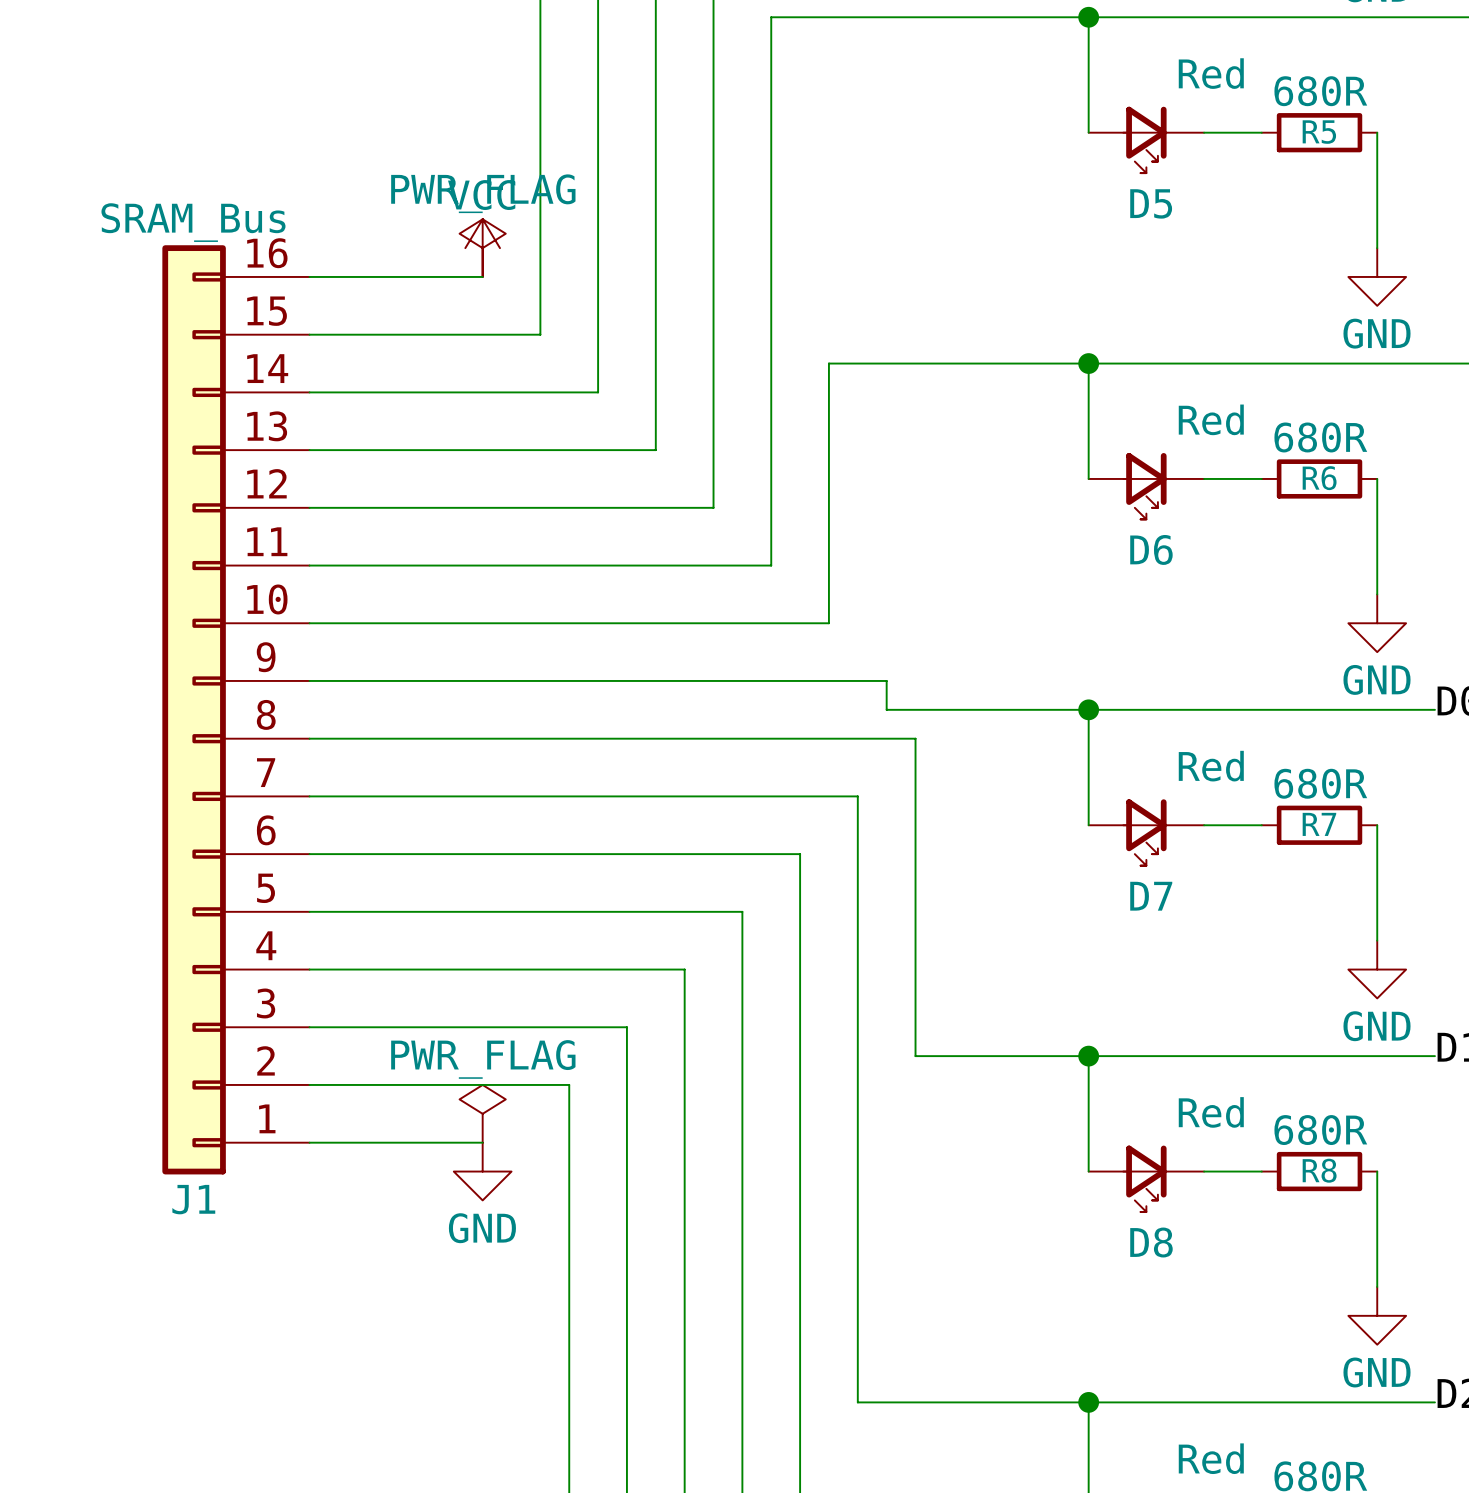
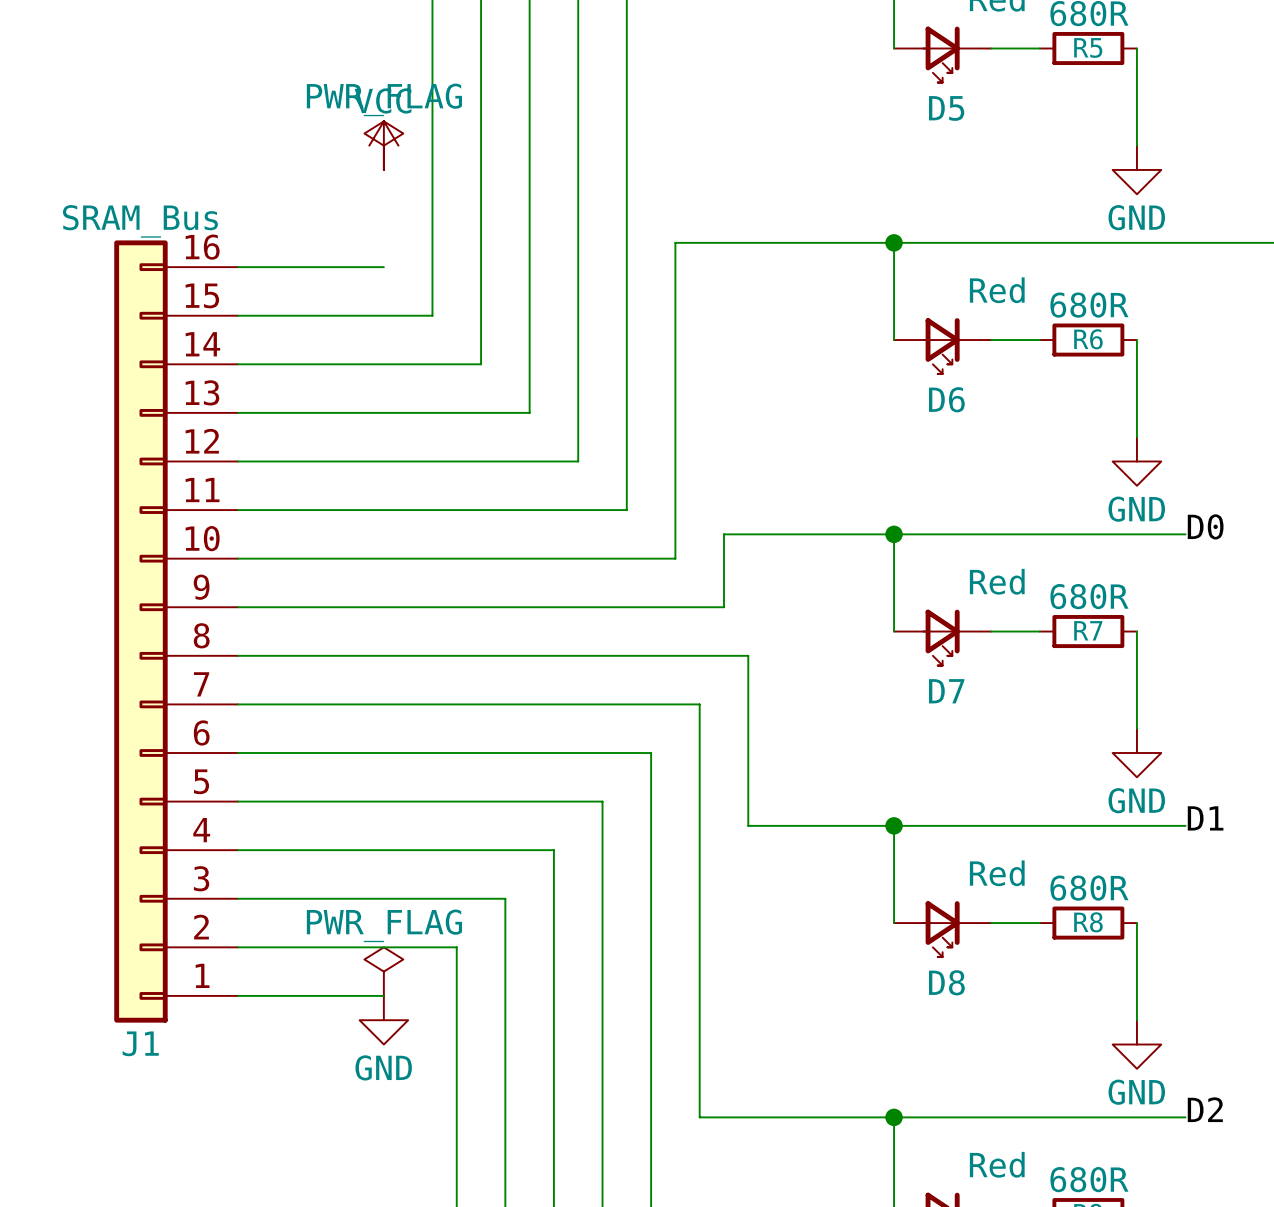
wire: (309, 276) (482, 276) -> none
wire: (309, 334) (540, 334) -> none
wire: (482, 392) (598, 392) -> (481, 364) (481, 267)
wire: (540, 450) (655, 450) -> (432, 315) (432, 218)
wire: (598, 507) (713, 507) -> (578, 461) (578, 364)
wire: (655, 565) (771, 565) -> (529, 412) (529, 315)
wire: none -> (626, 412) (626, 510)
wire: (713, 623) (828, 623) -> (675, 558) (675, 461)
wire: (771, 680) (886, 680) (886, 709) -> (699, 607) (723, 607) (723, 534)
J1 position: (235, 709) -> (176, 631)
wire: (828, 738) (915, 738) (915, 854) -> (651, 655) (748, 655)
wire: (857, 796) (857, 911) -> (602, 704) (699, 704)
wire: (800, 854) (800, 969) -> (553, 752) (651, 752)
wire: (742, 911) (742, 1027) -> (505, 801) (602, 801)
wire: (684, 969) (684, 1084) -> (456, 850) (553, 850)
wire: (626, 1027) (626, 1142) -> (383, 898) (505, 898)
wire: (569, 1084) (569, 1200) -> (238, 947) (456, 947)
power symbol position: PWR_FLAG (482, 1113) -> PWR_FLAG (383, 971)
power symbol position: GND (482, 1171) -> GND (383, 1020)
wire: none -> (238, 995) (383, 995)

